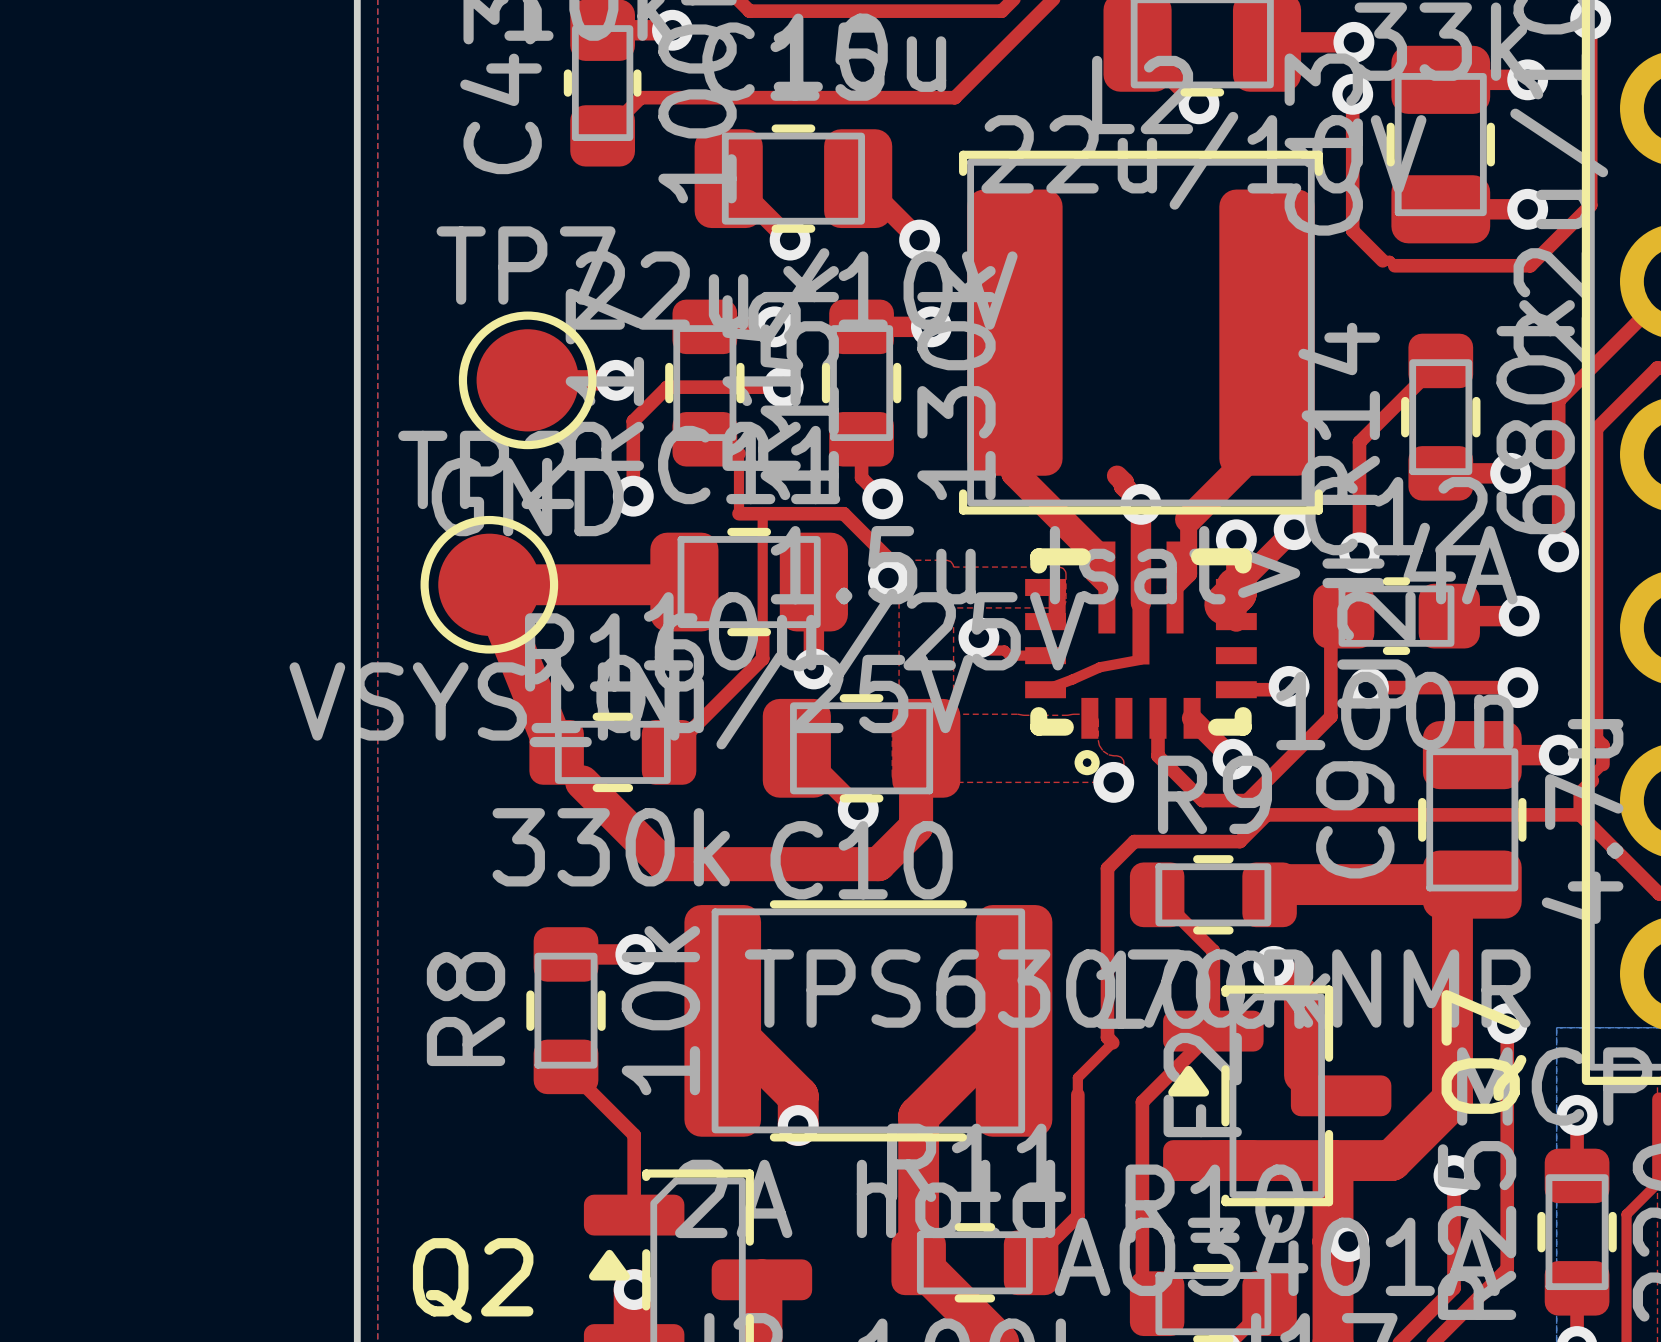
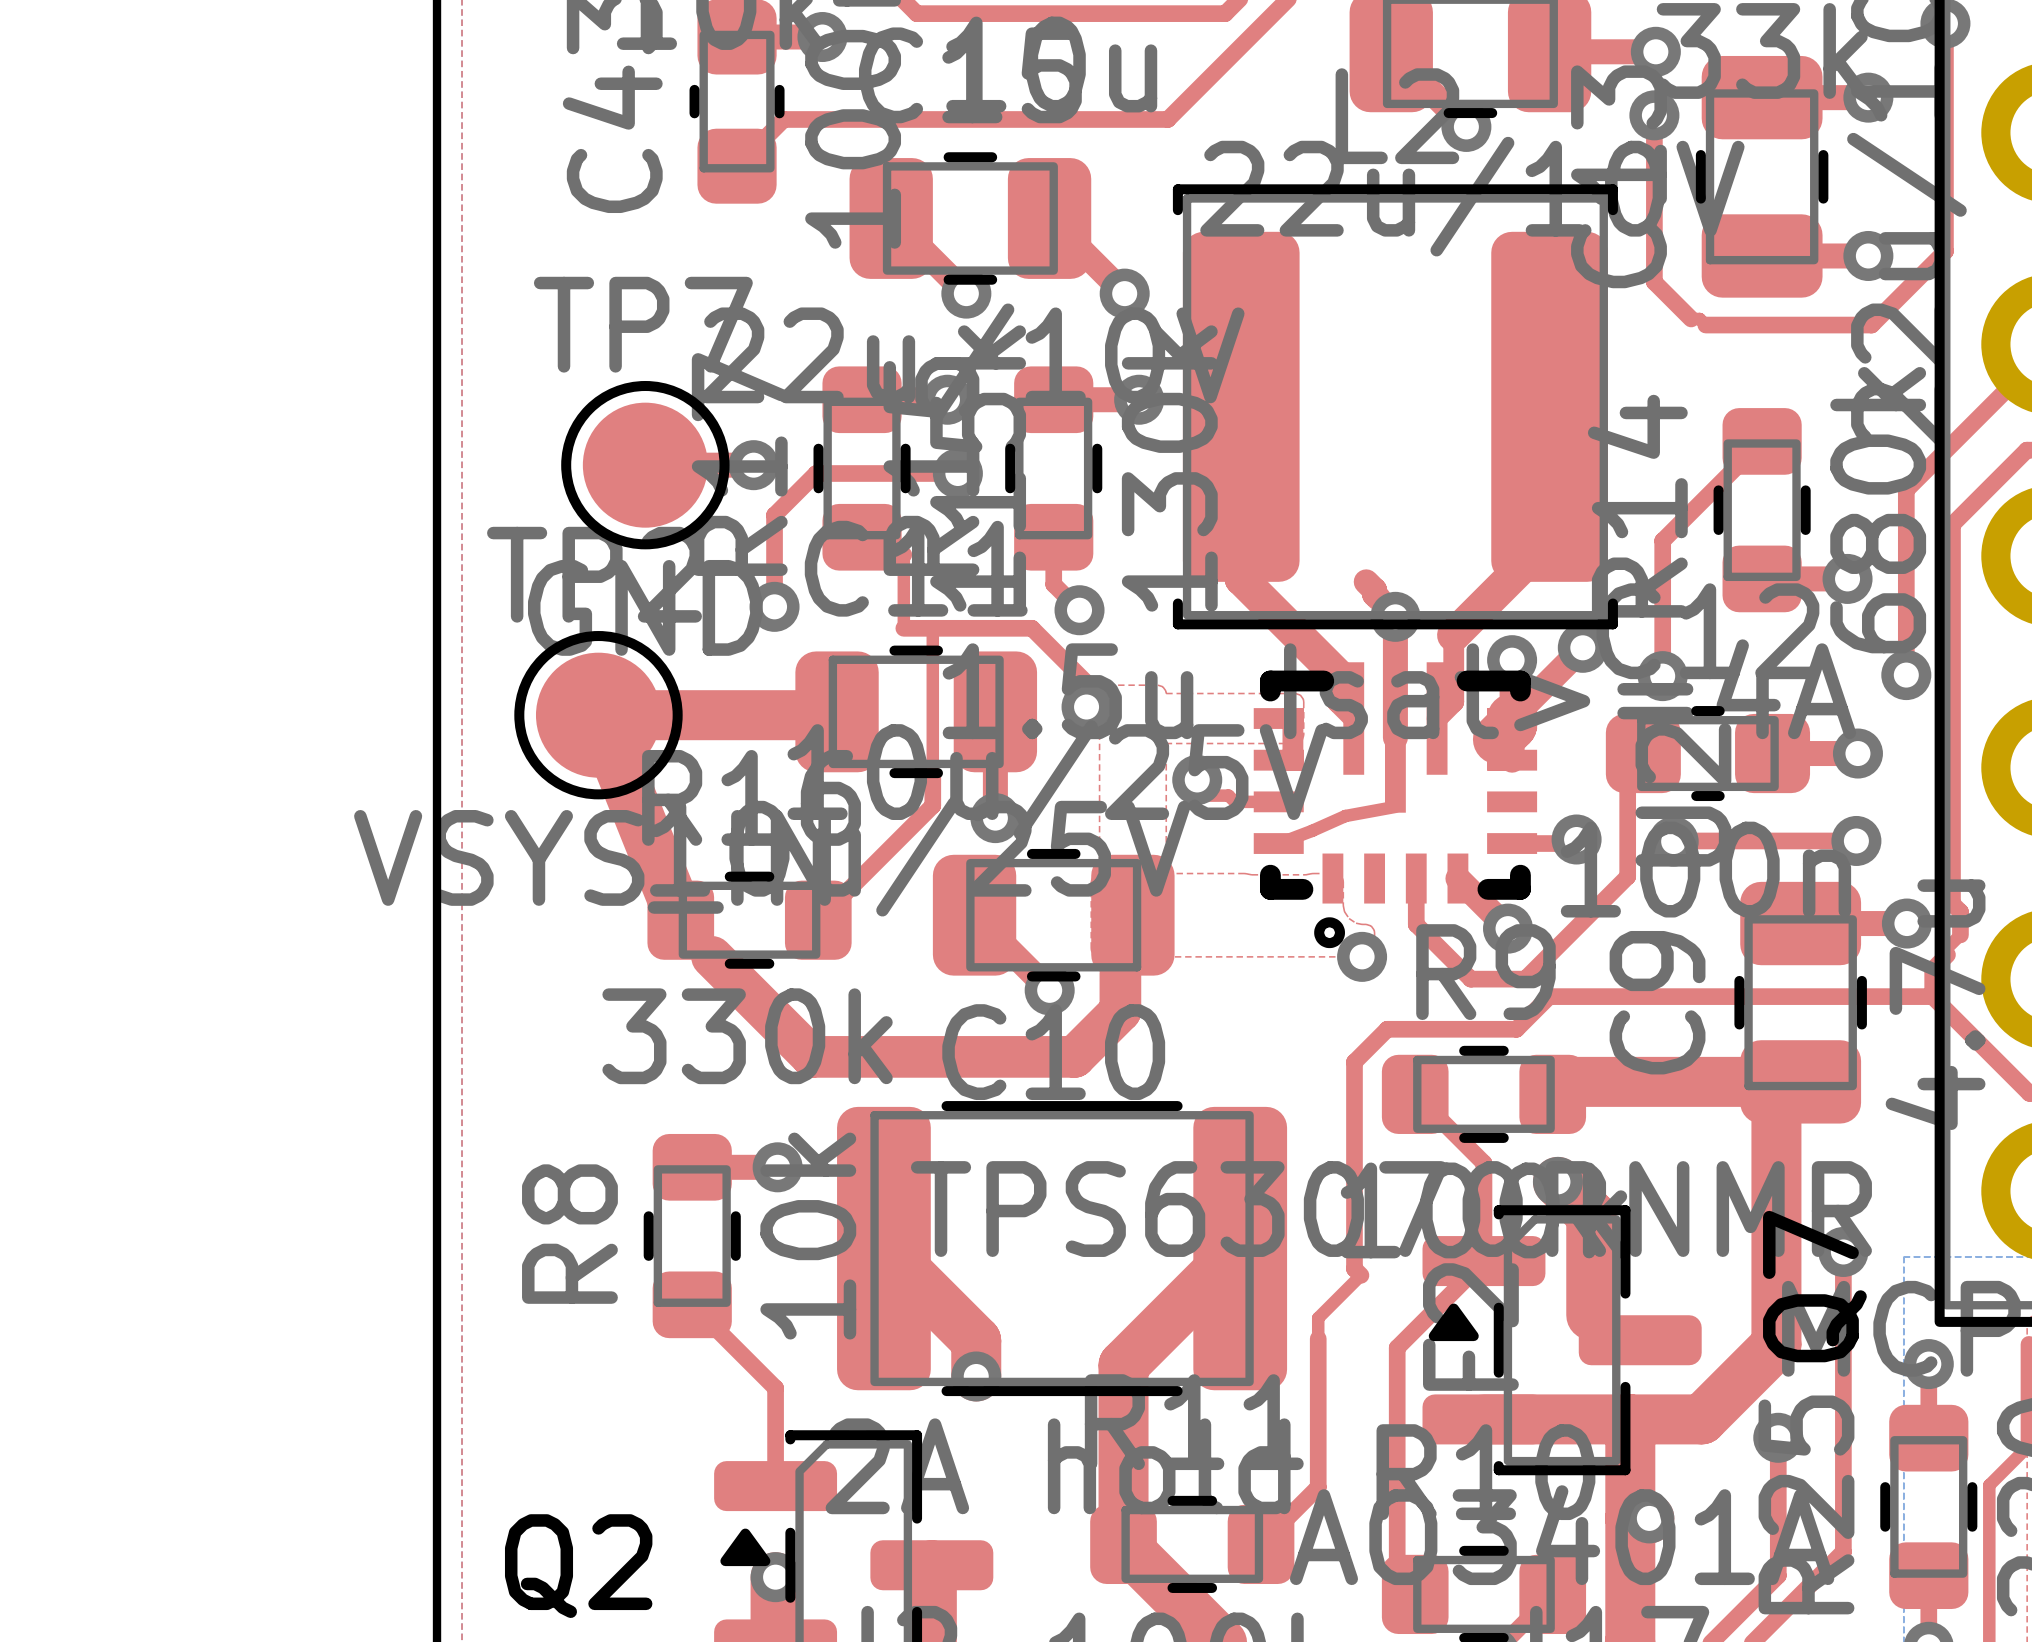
top track width: thin (1273, 966) (1301, 993) (1301, 1075) -> thick (1557, 1181) (1591, 1215) (1591, 1315)

